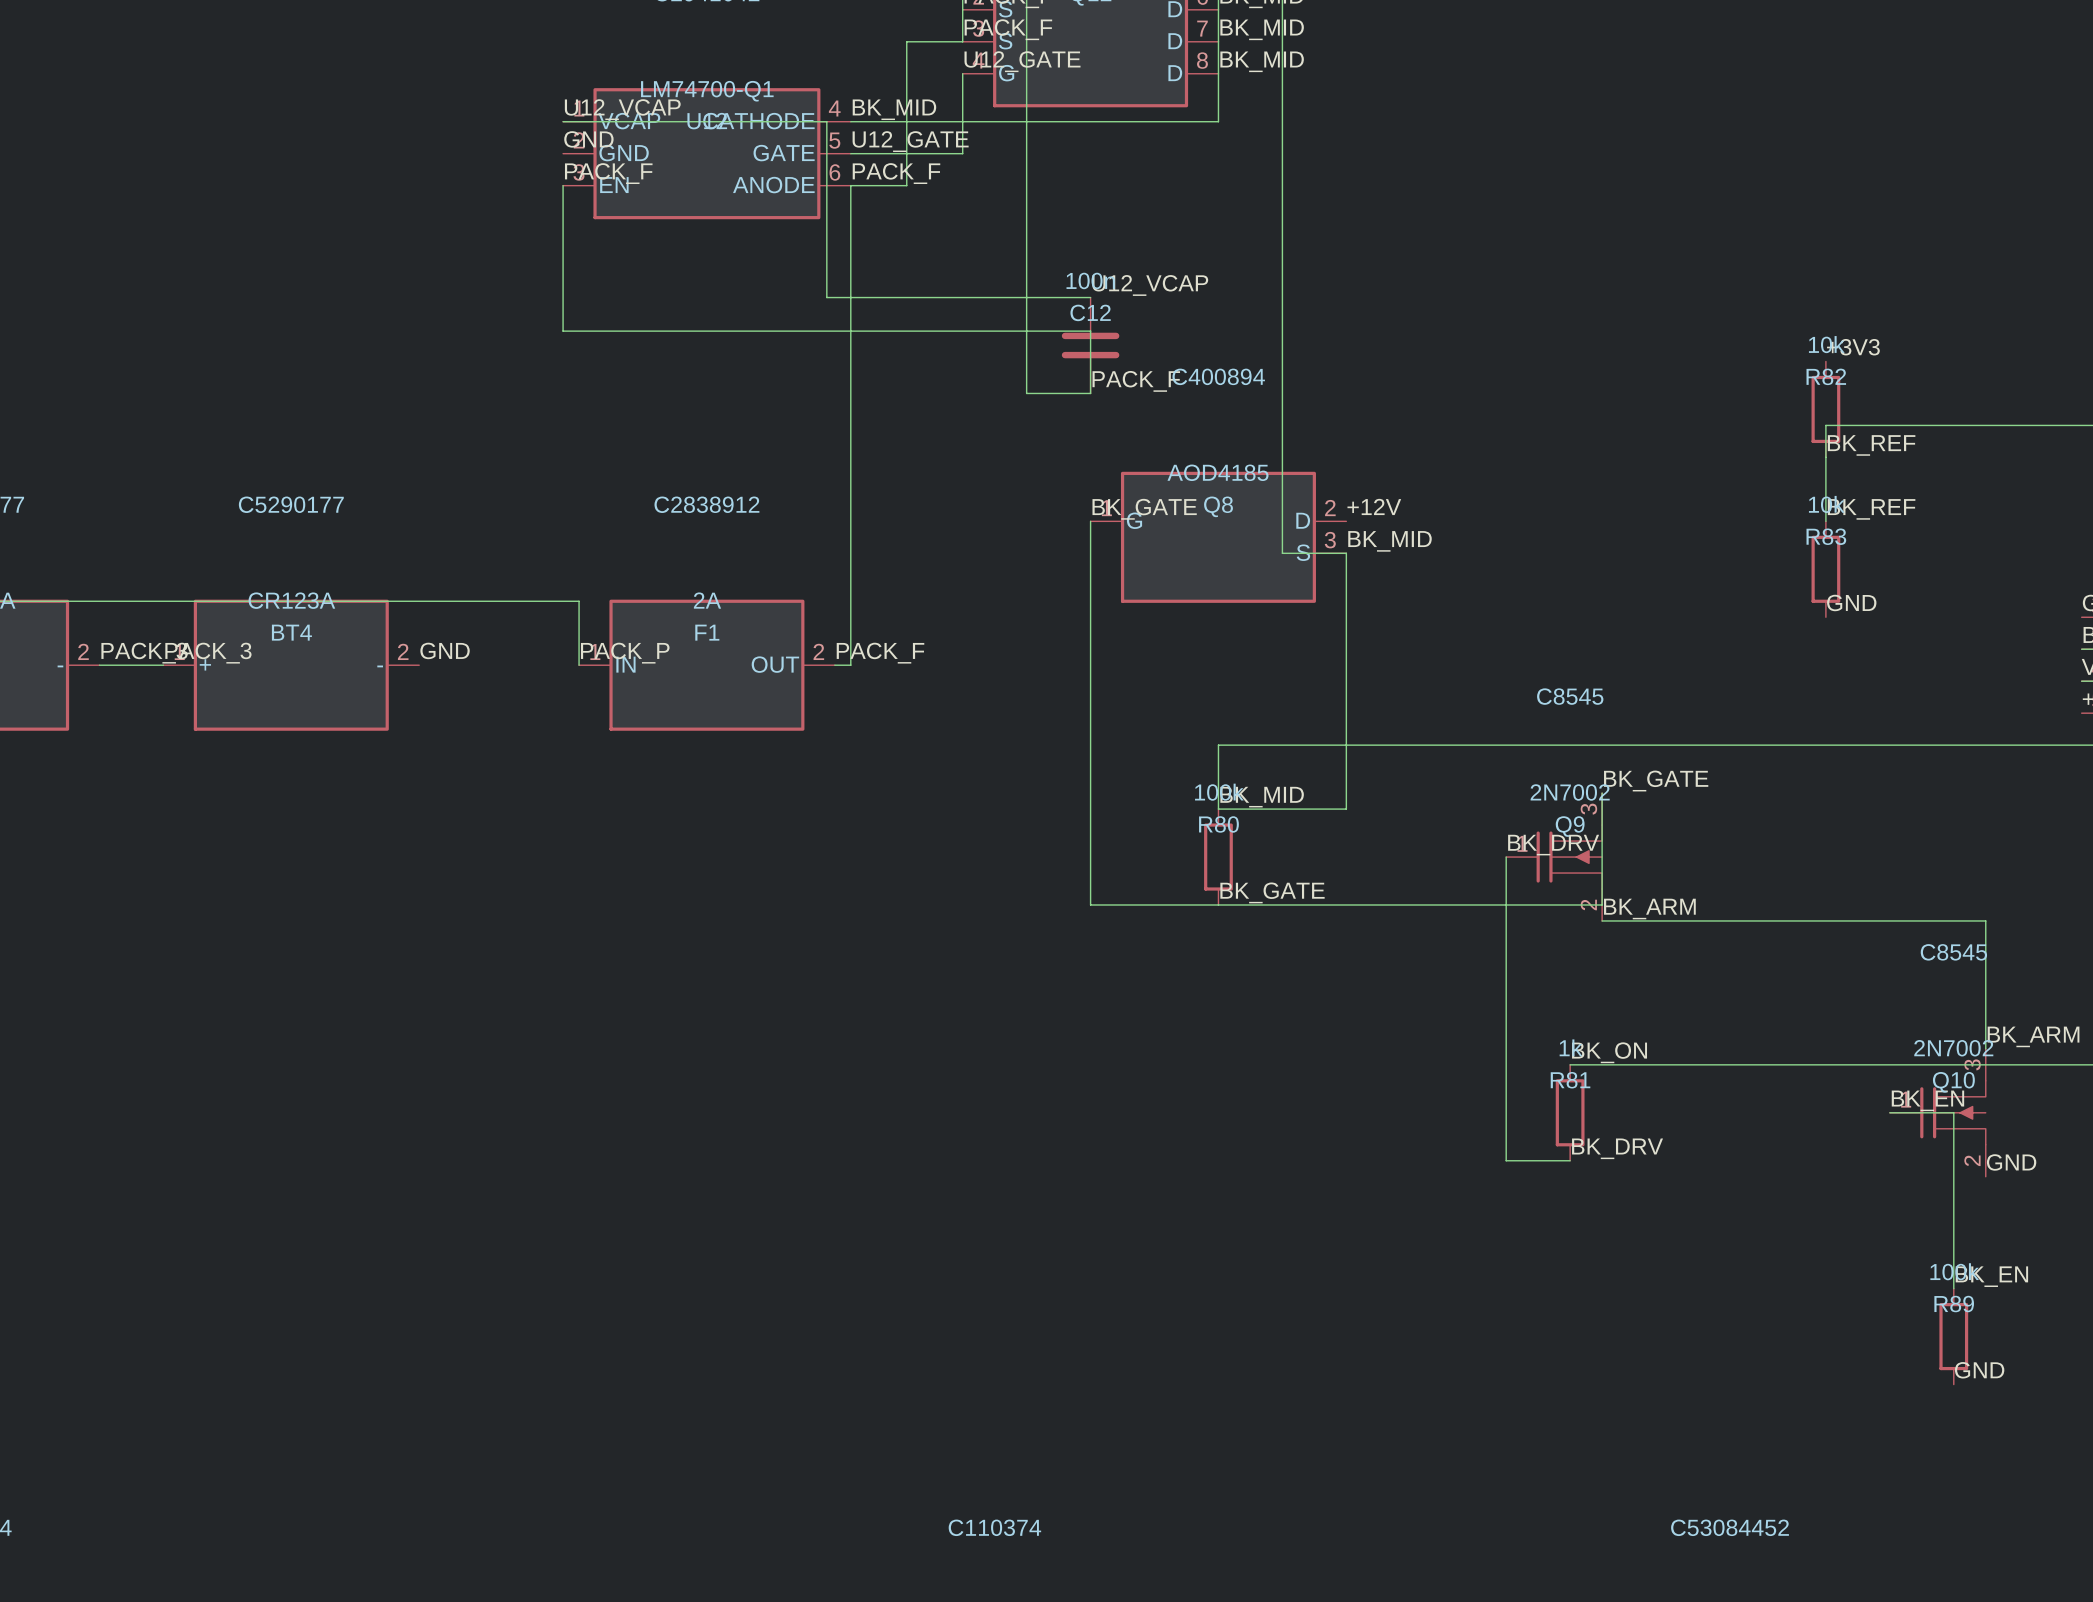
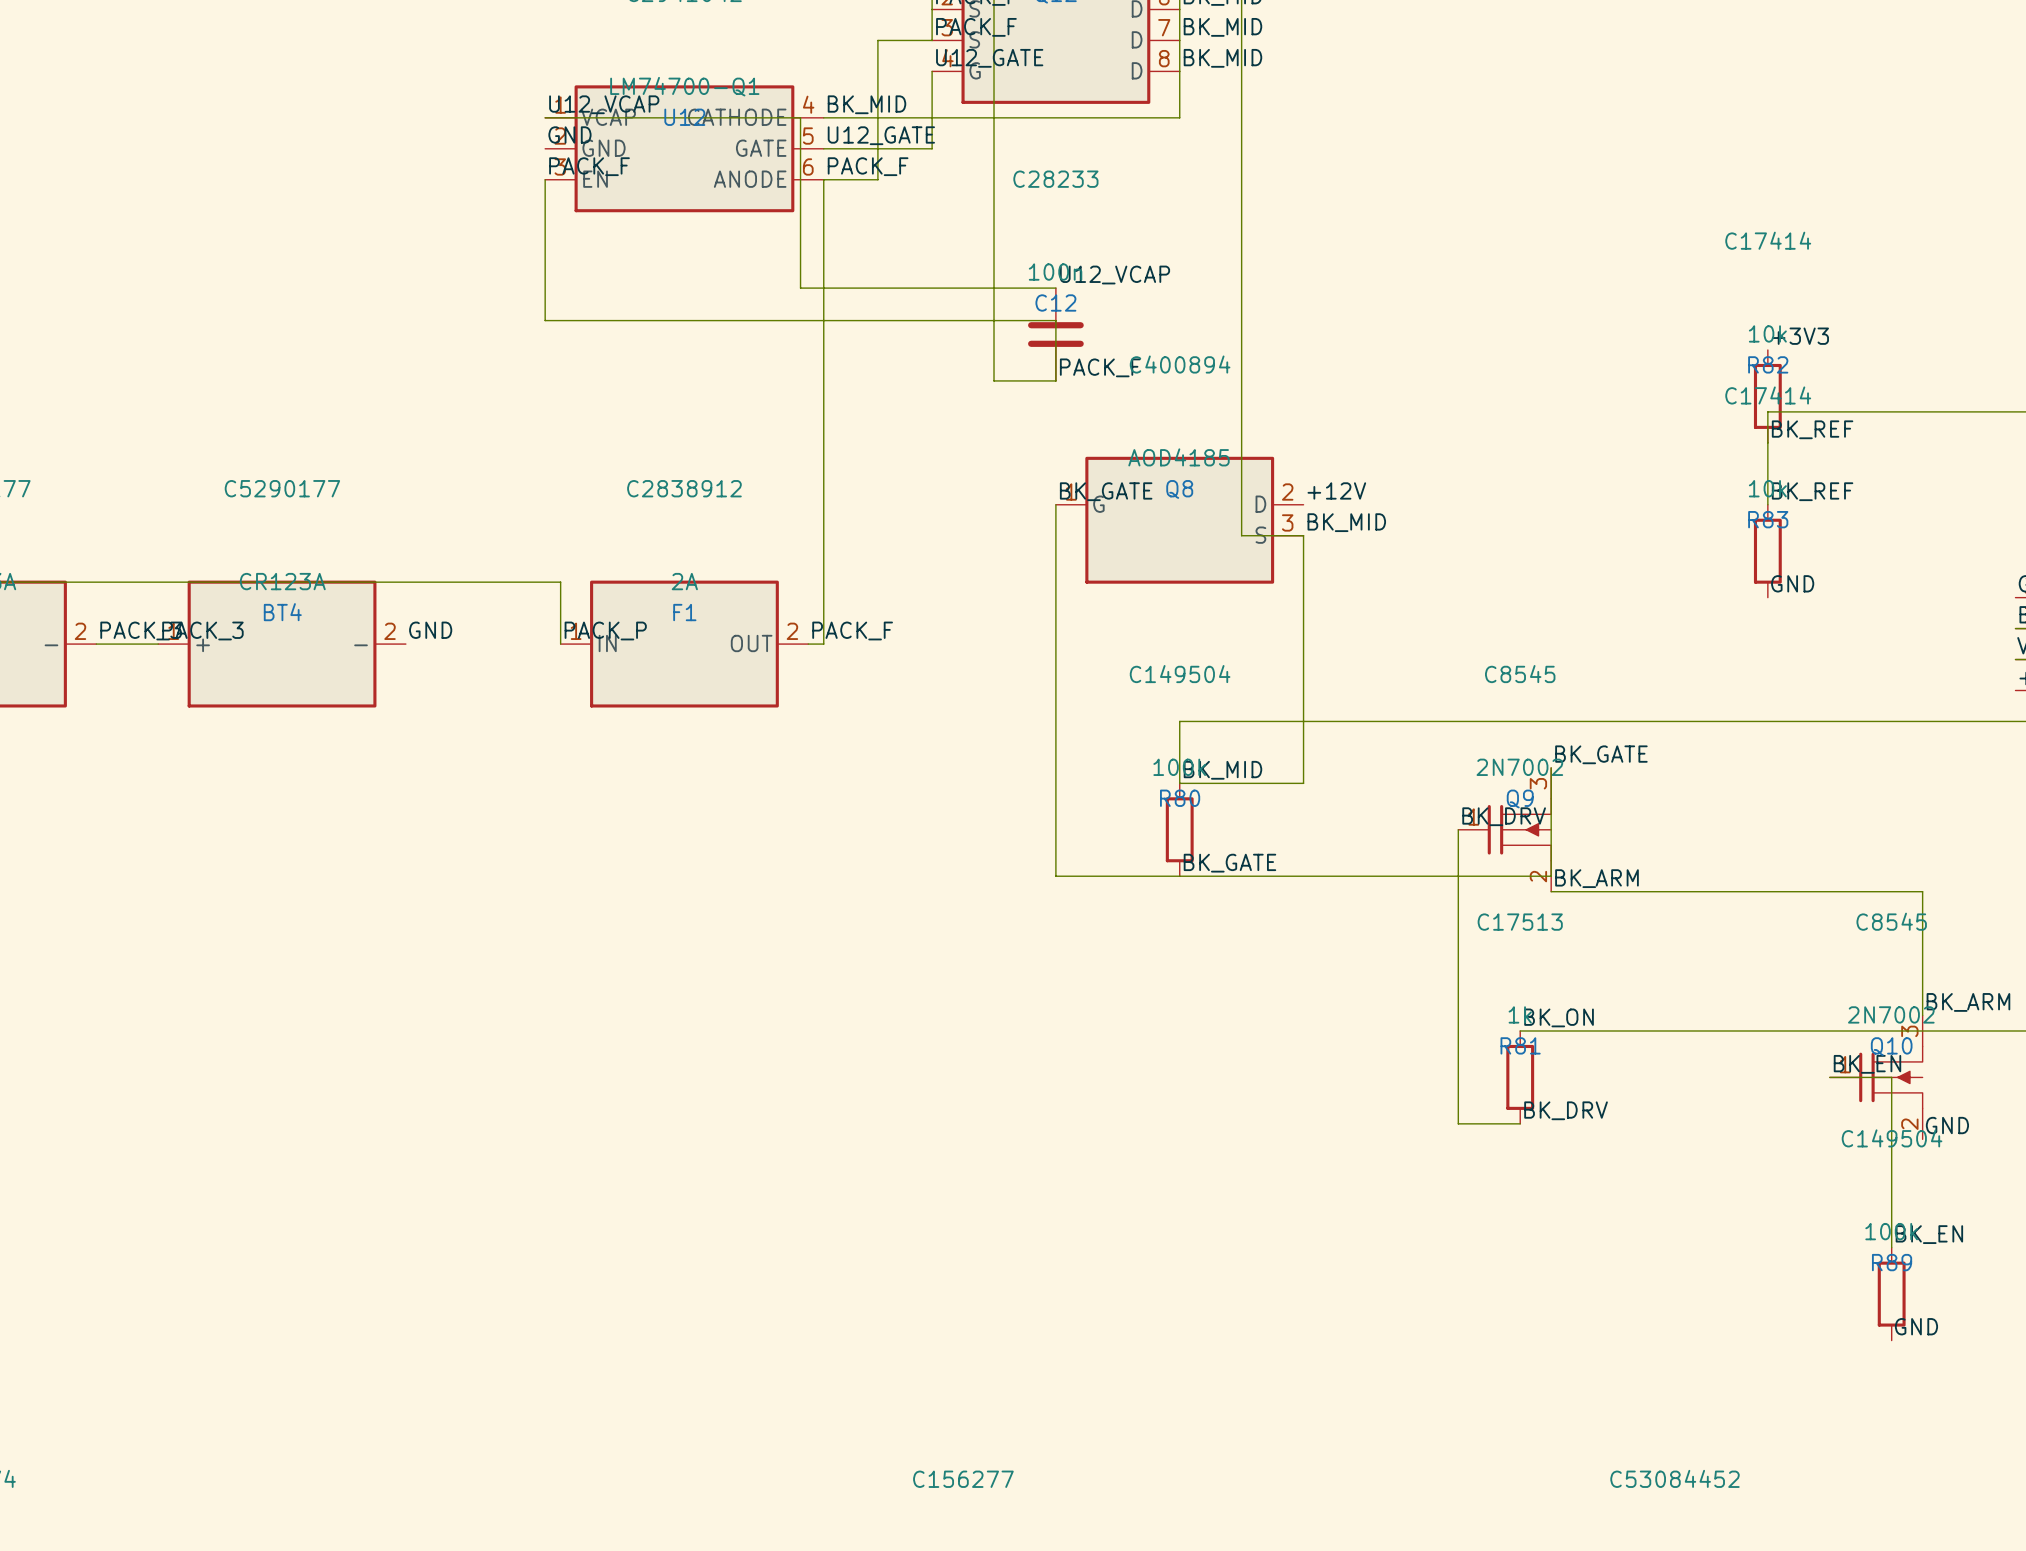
C12 text: none -> C28233 (1055, 179)
R82 text: none -> C17414 (1768, 240)
R83 text: none -> C17414 (1768, 395)
R80 text: none -> C149504 (1180, 674)
R81 text: none -> C17513 (1520, 922)
R89 text: none -> C149504 (1892, 1138)
part text: C110374 (994, 1527) -> C156277 (963, 1479)

